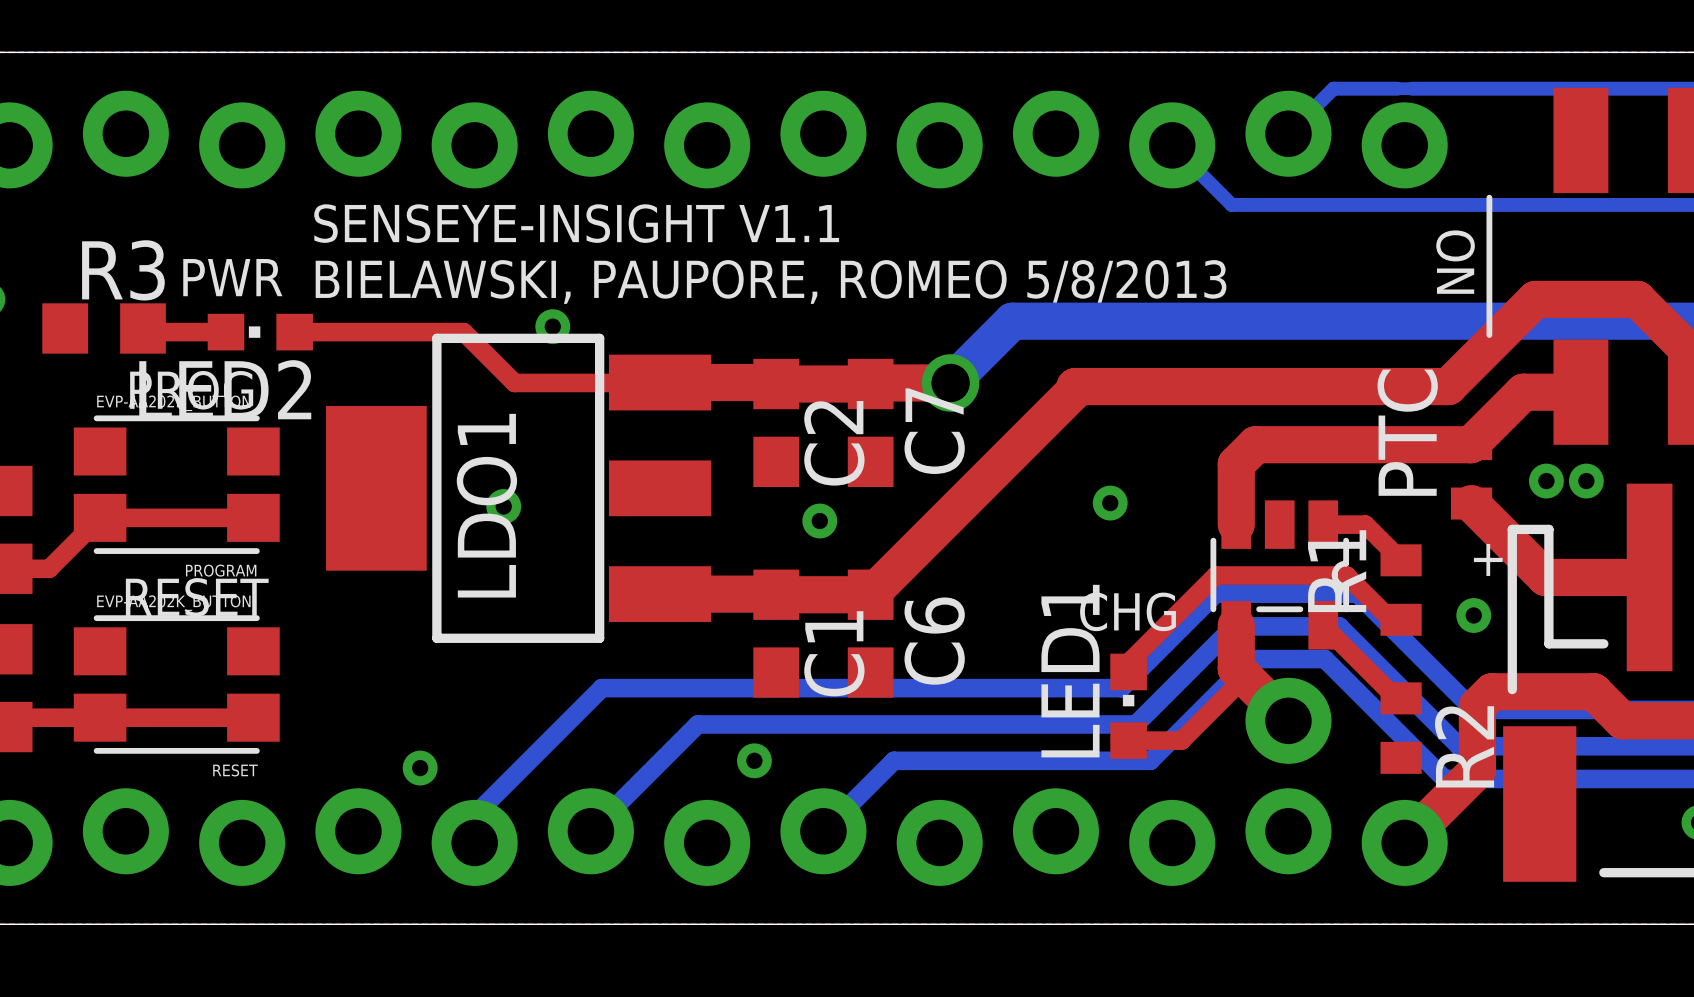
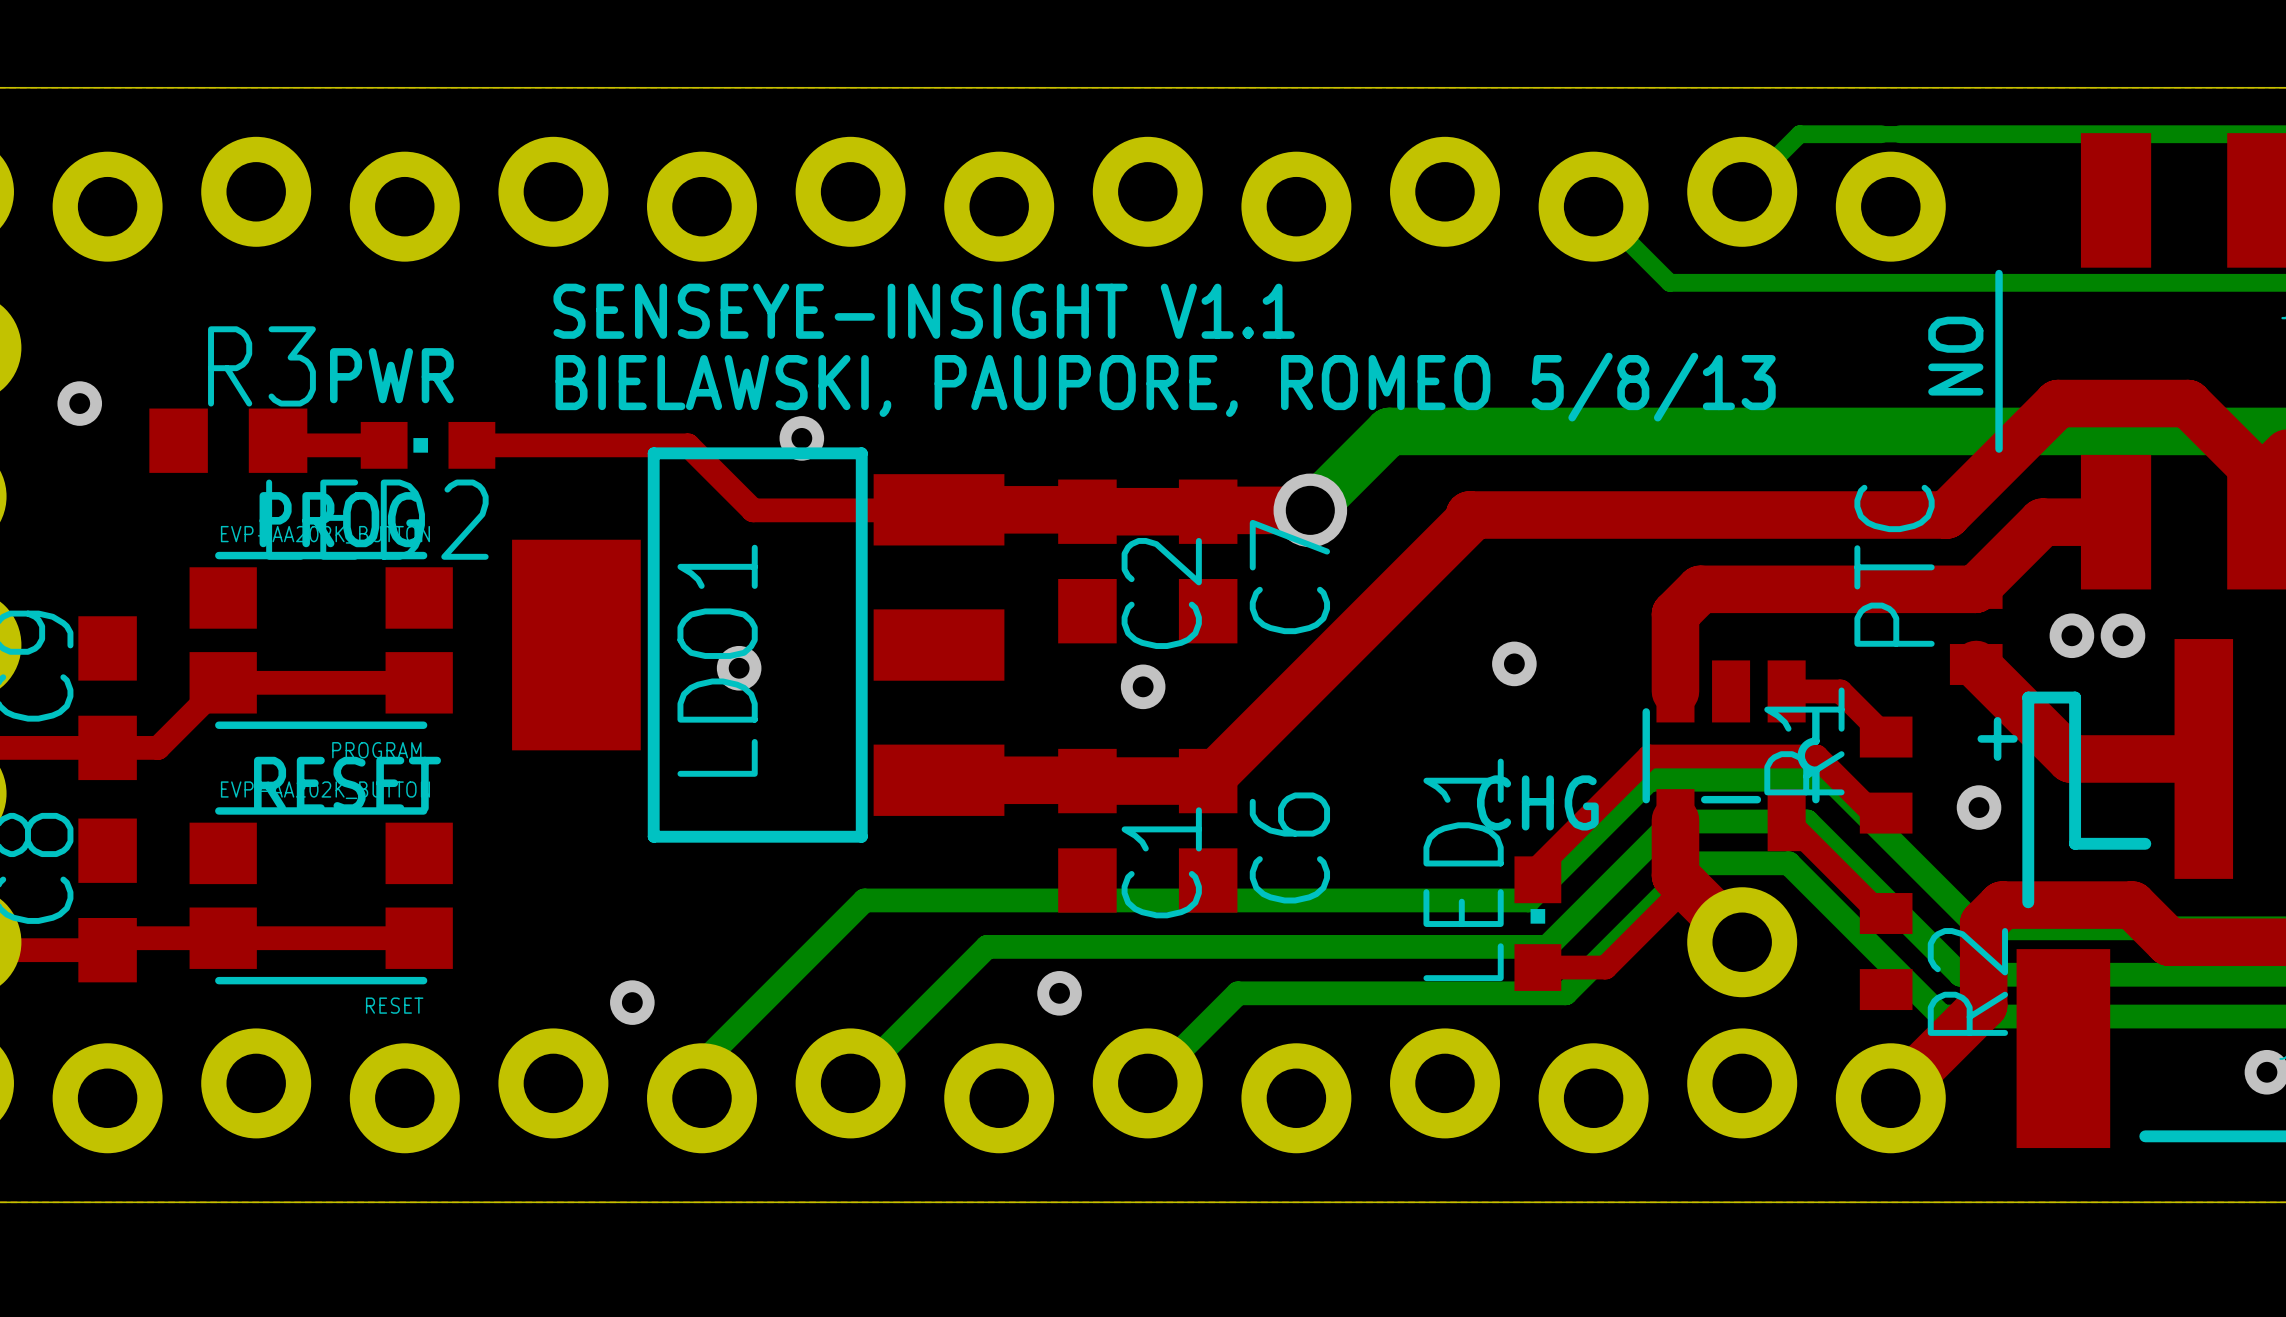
text position: SENSEYE-INSIGHT V1.1 (576, 223) -> SENSEYE-INSIGHT V1.1 (924, 311)
text: BIELAWSKI, PAUPORE, ROMEO 5/8/2013 (771, 281) -> BIELAWSKI, PAUPORE, ROMEO 5/8/13 (1165, 387)

